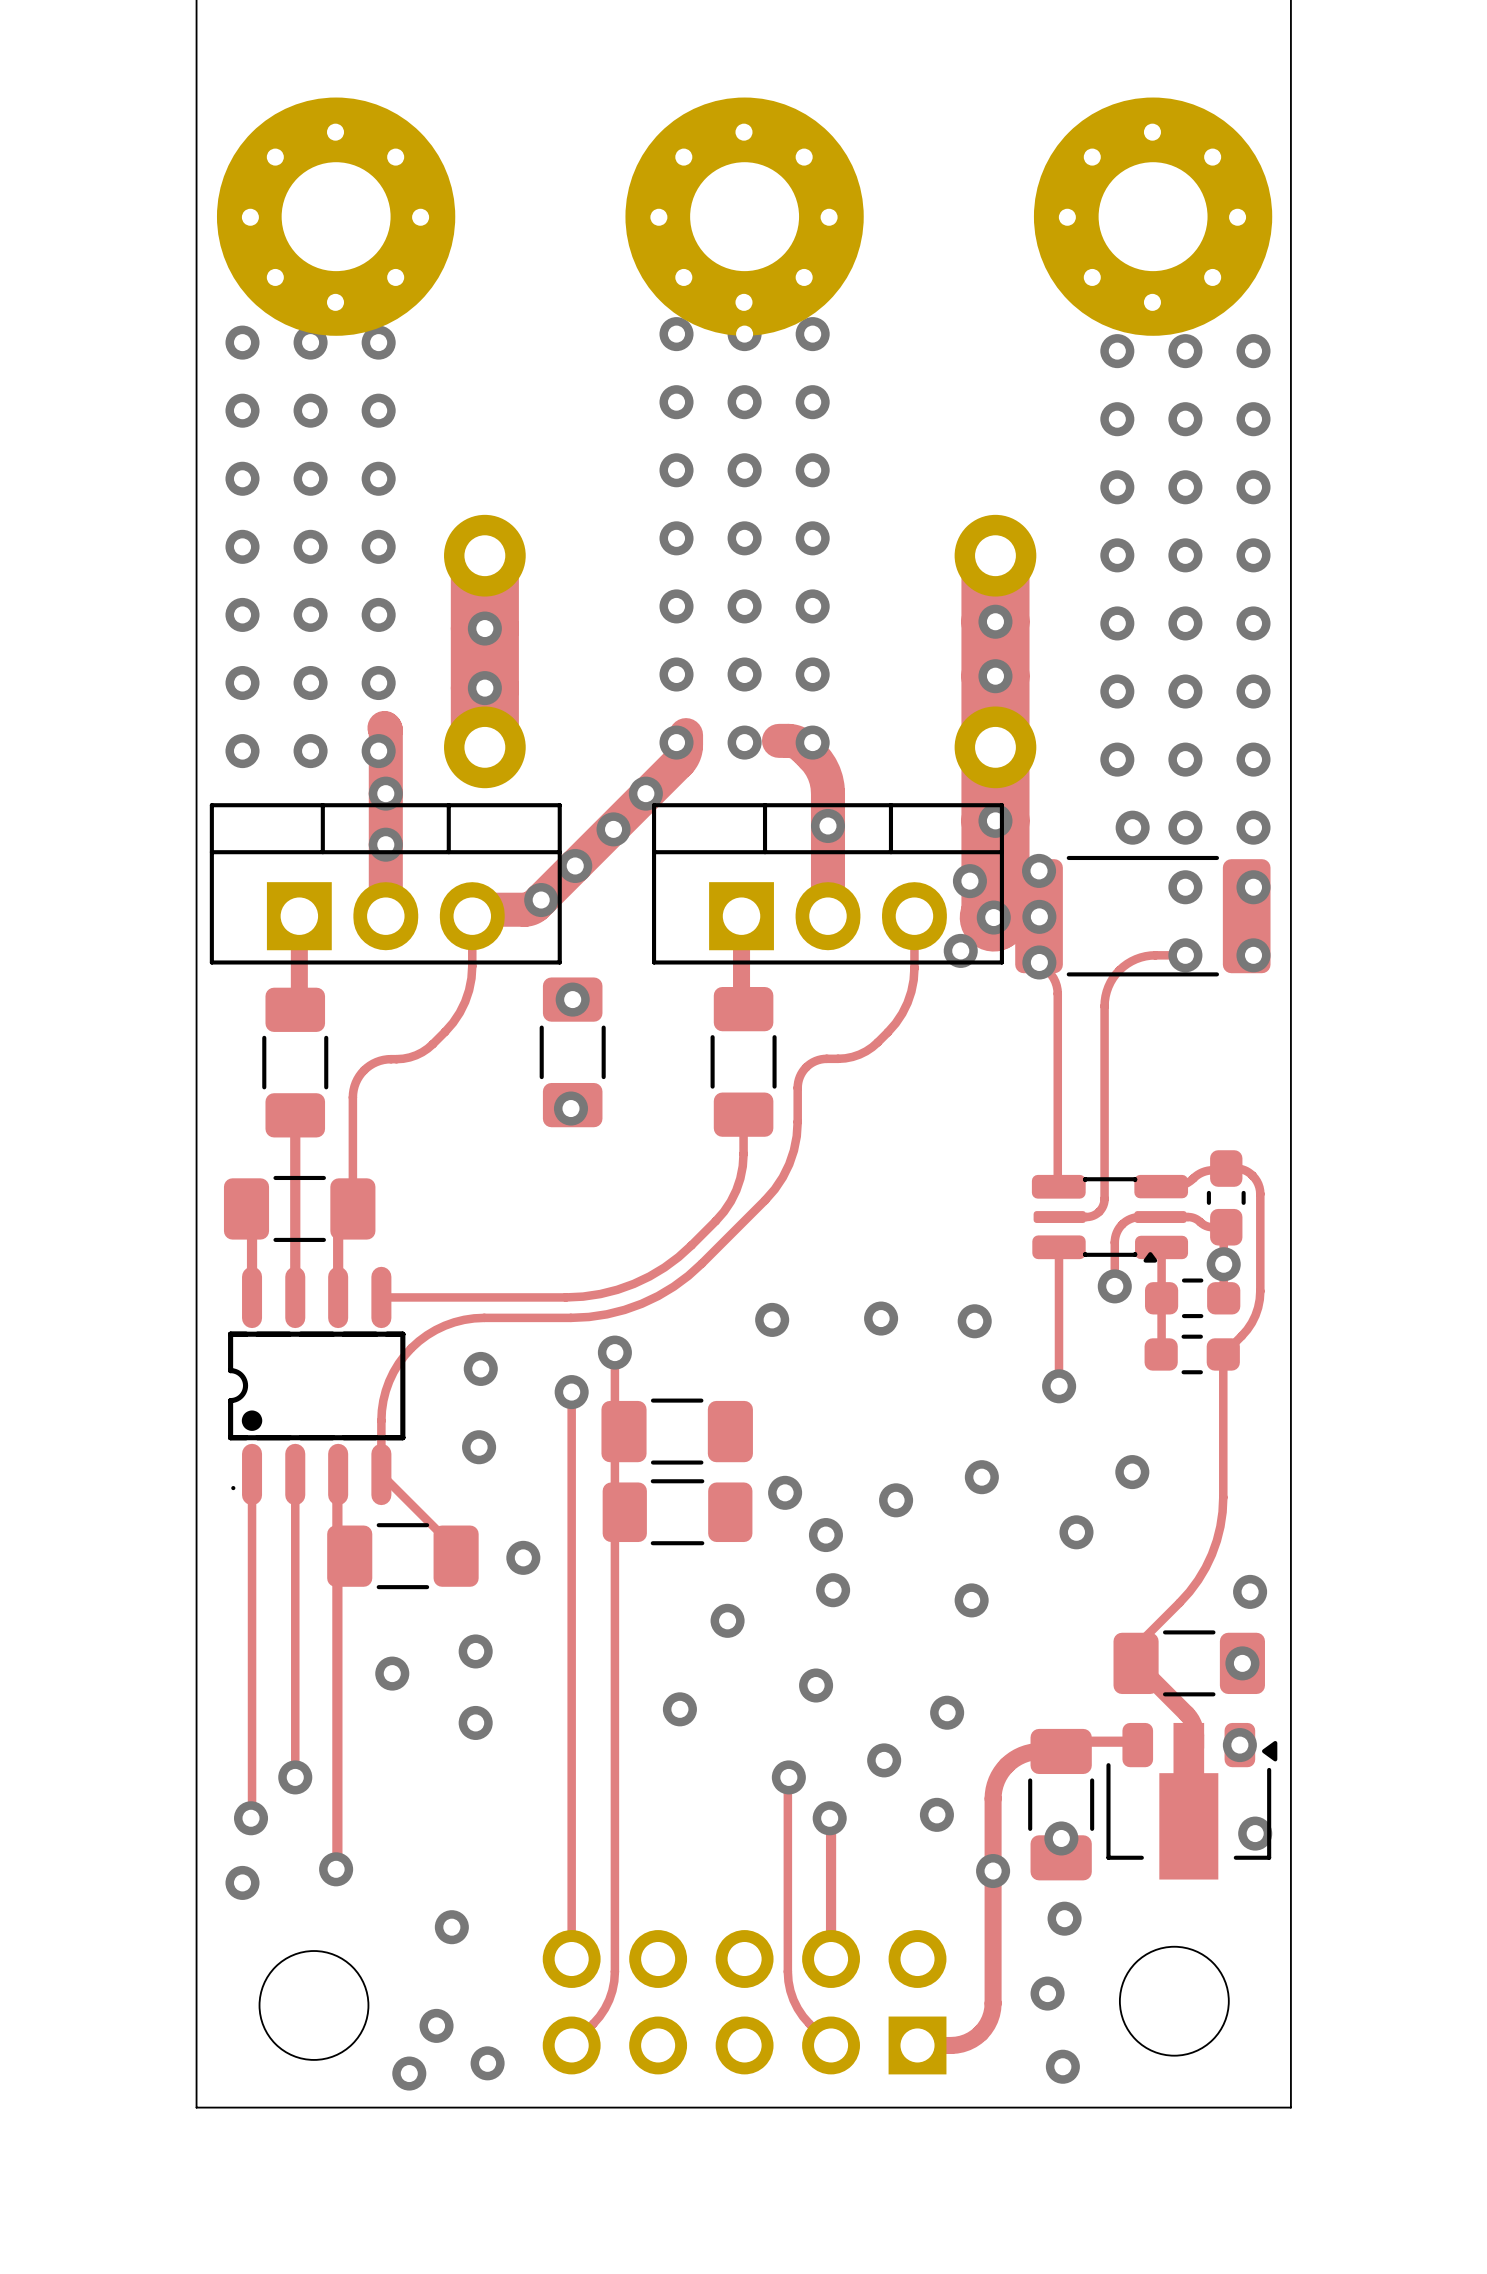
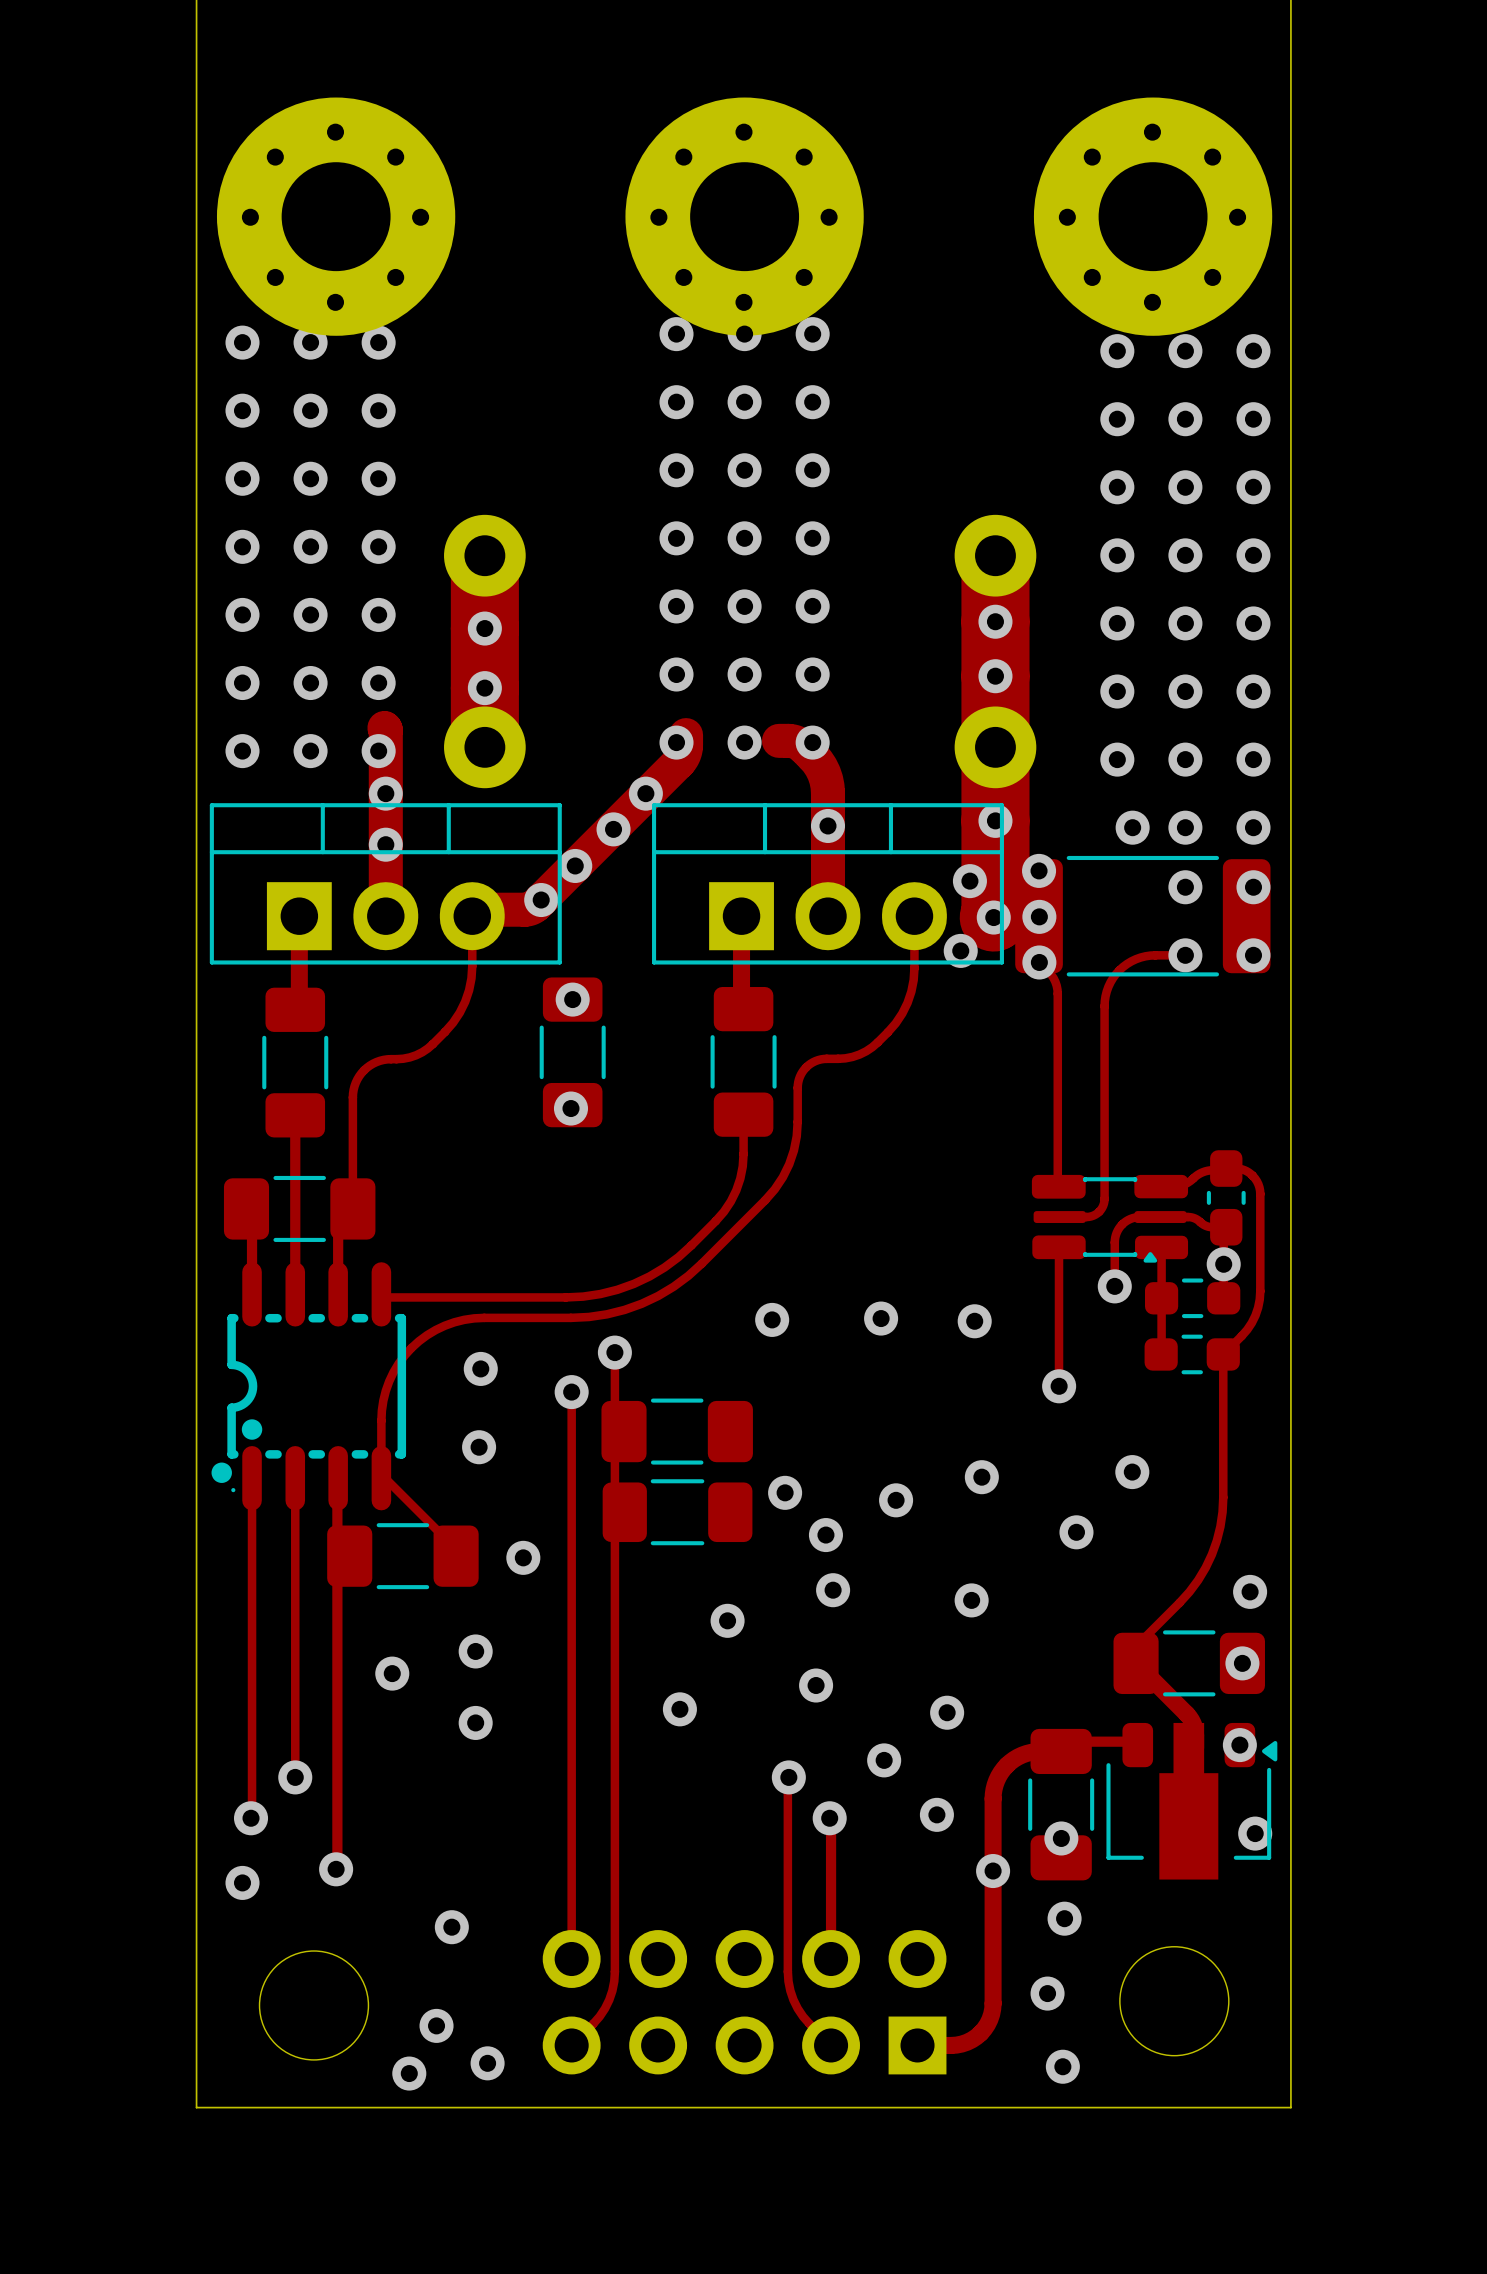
part footprint: [227, 1266, 406, 1506] -> [211, 1262, 407, 1511]

